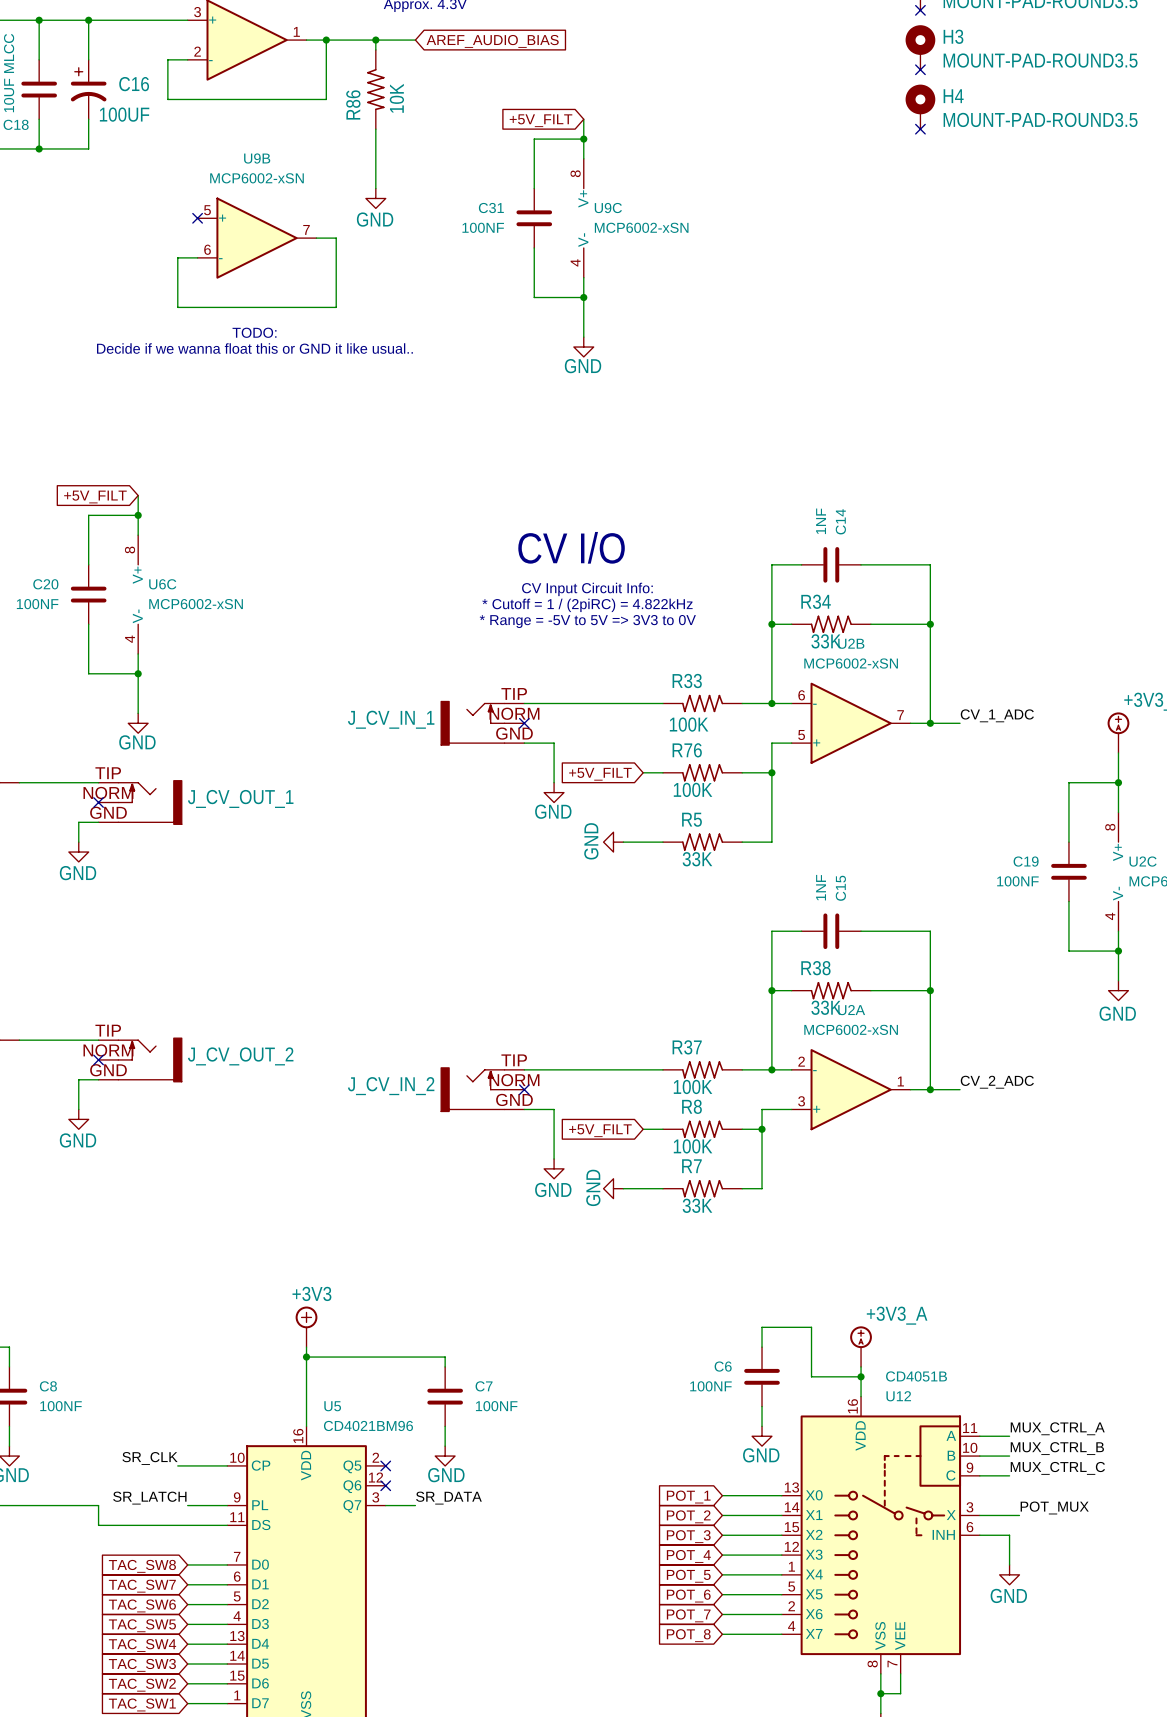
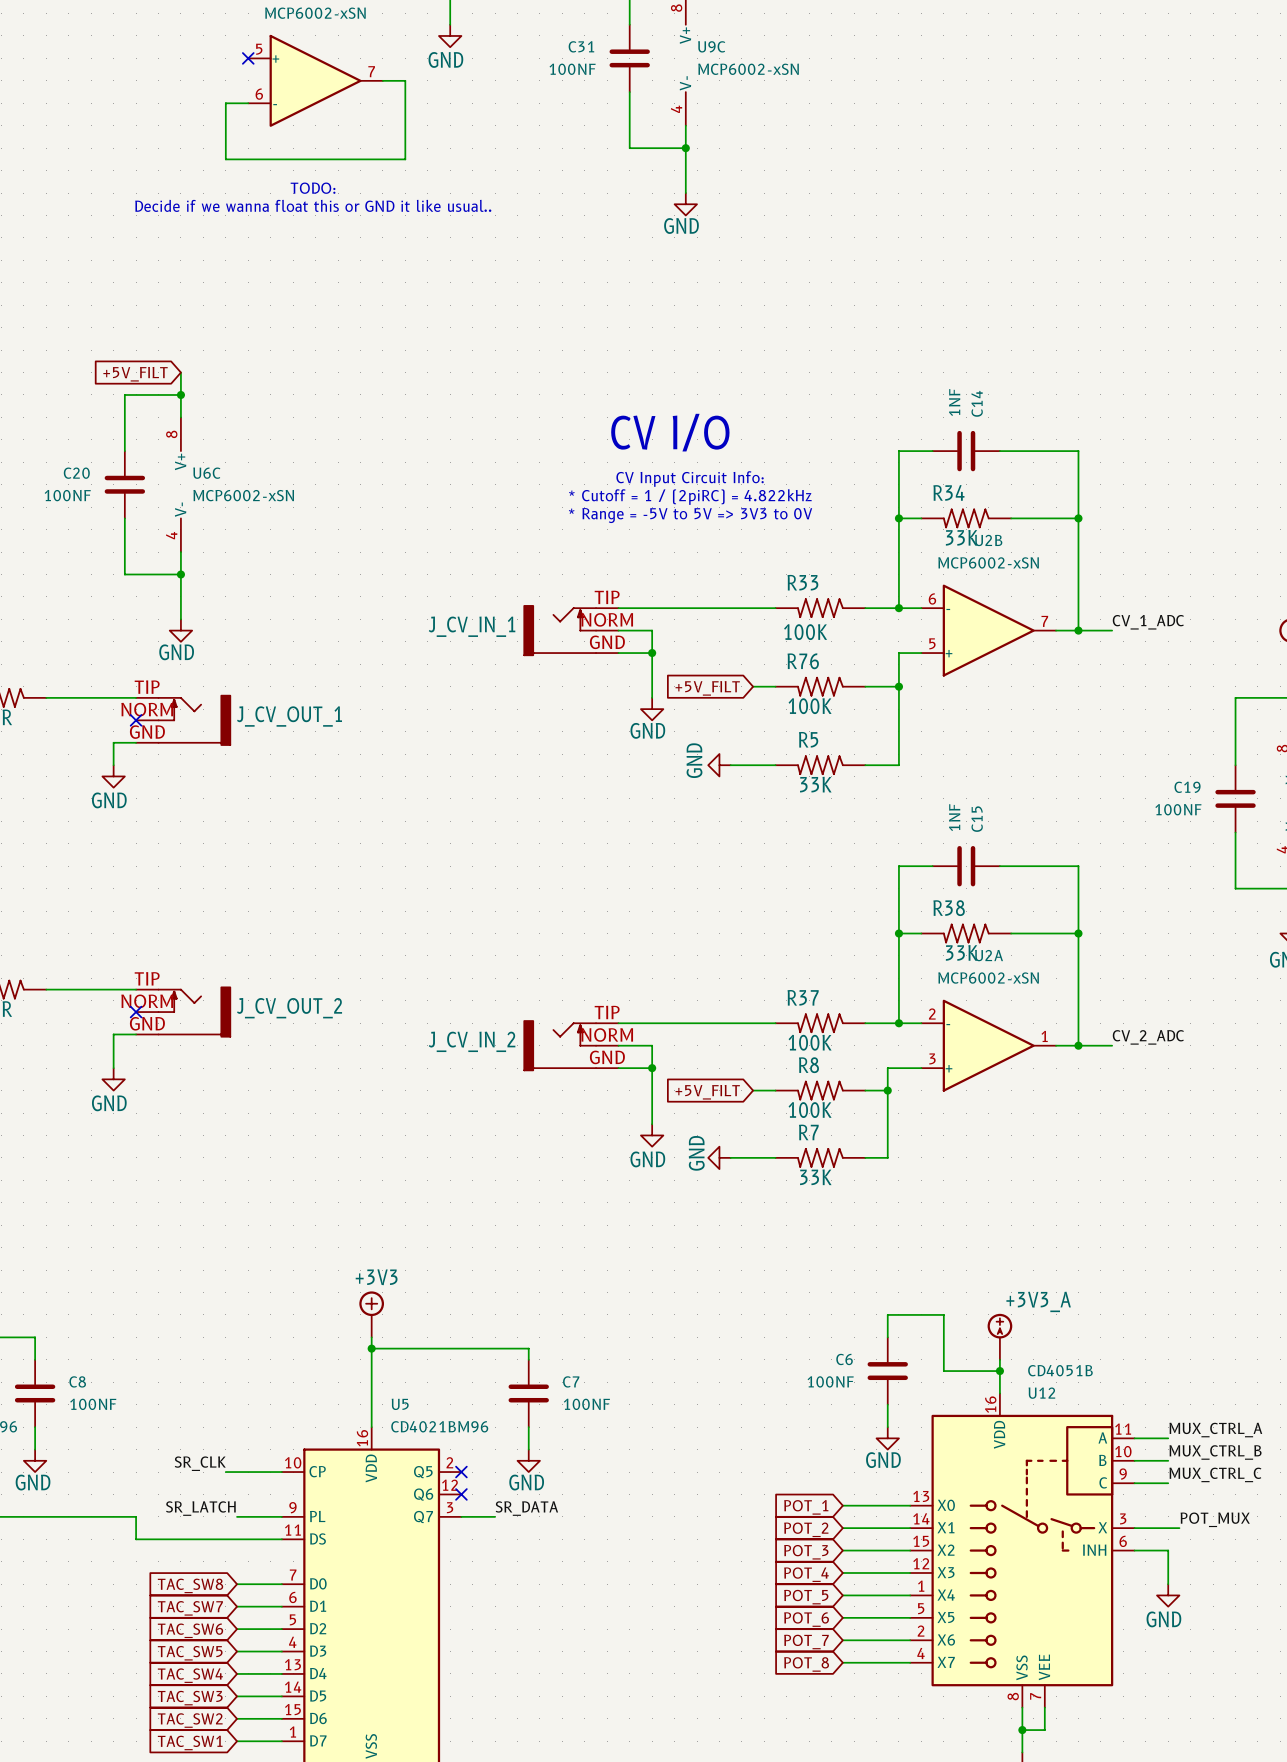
wire: none -> (618, 630) (652, 630) (652, 653)
no-connect mark: (524, 723) -> none
junction: none -> (652, 653)
wire: none -> (618, 1045) (652, 1045) (652, 1068)
no-connect mark: (524, 1089) -> none
junction: none -> (652, 1068)

